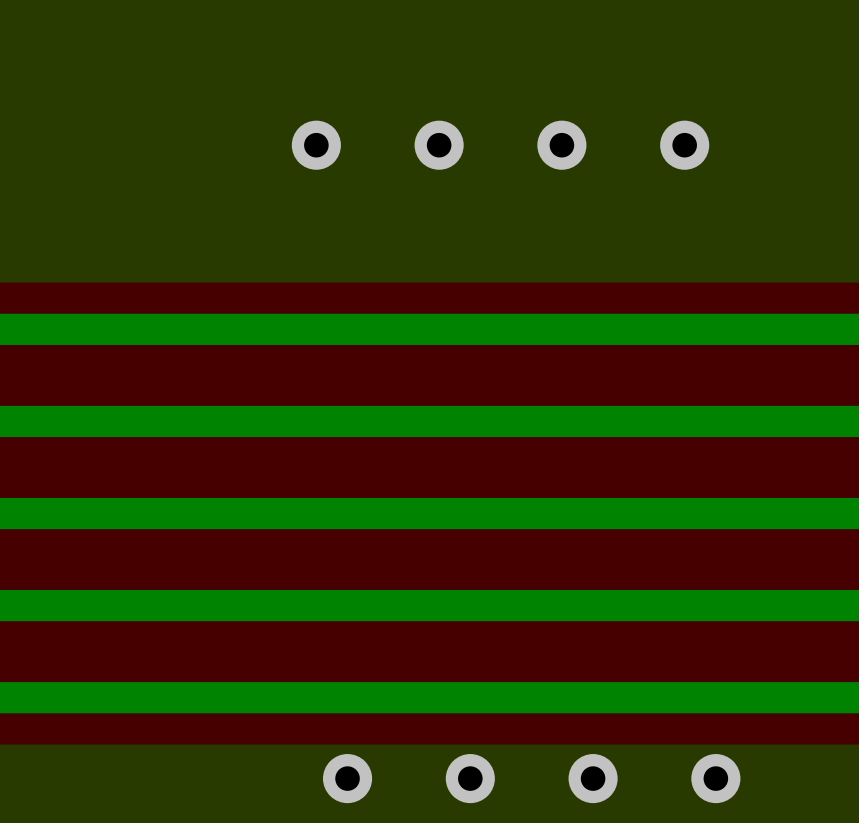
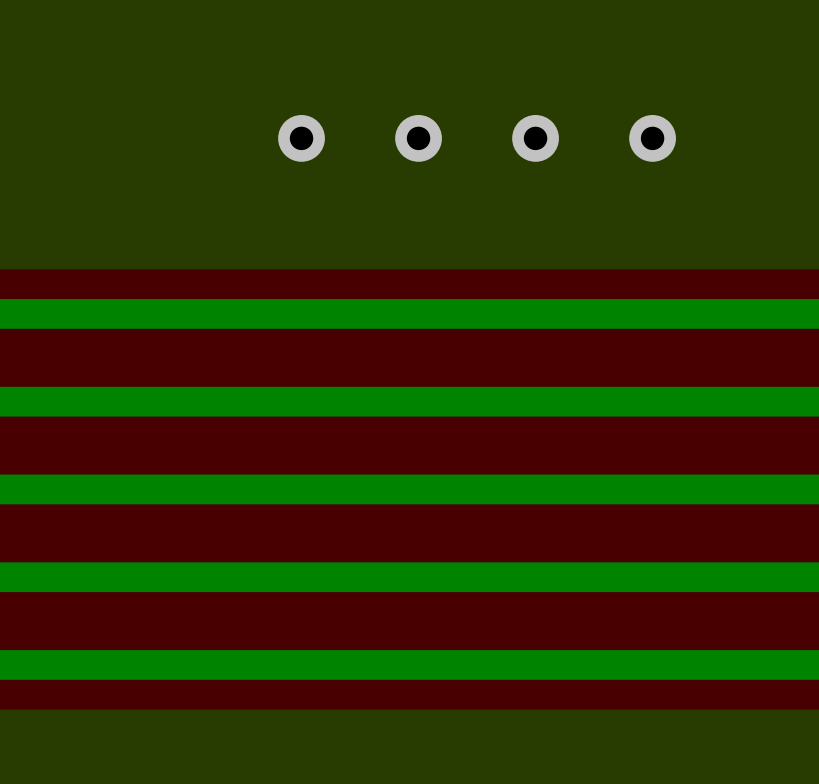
via: (347, 778) -> none
via: (470, 778) -> none
via: (593, 778) -> none
via: (715, 778) -> none

